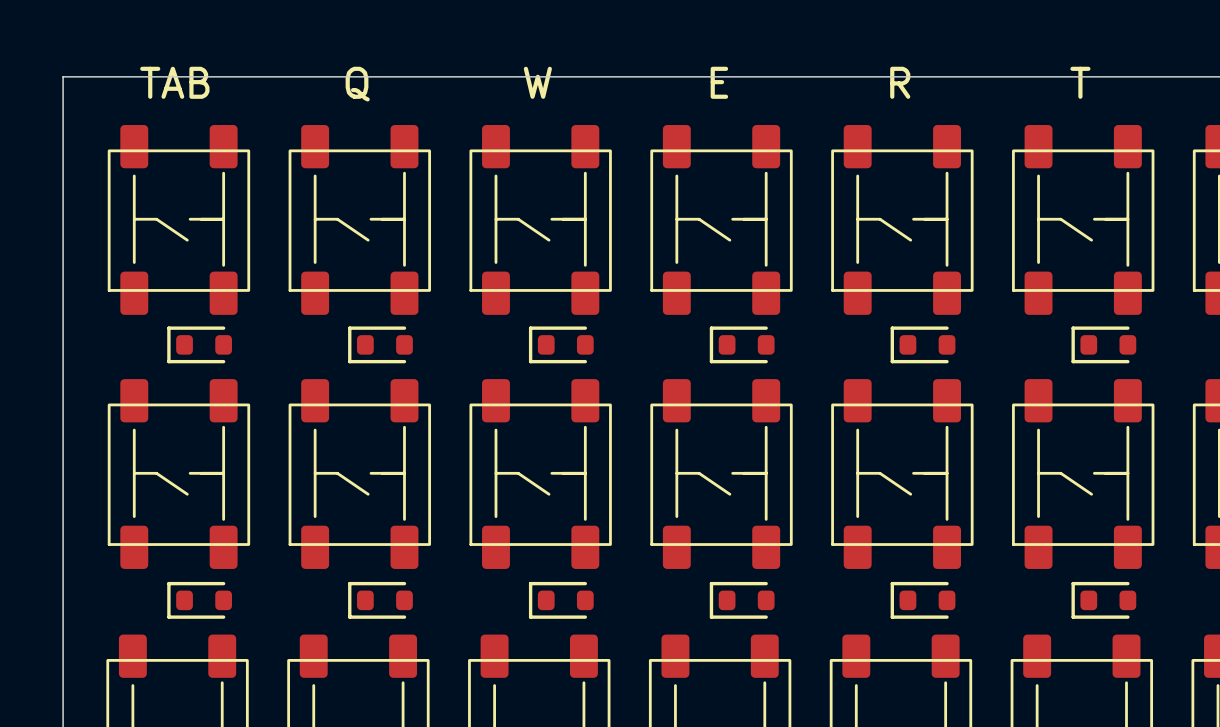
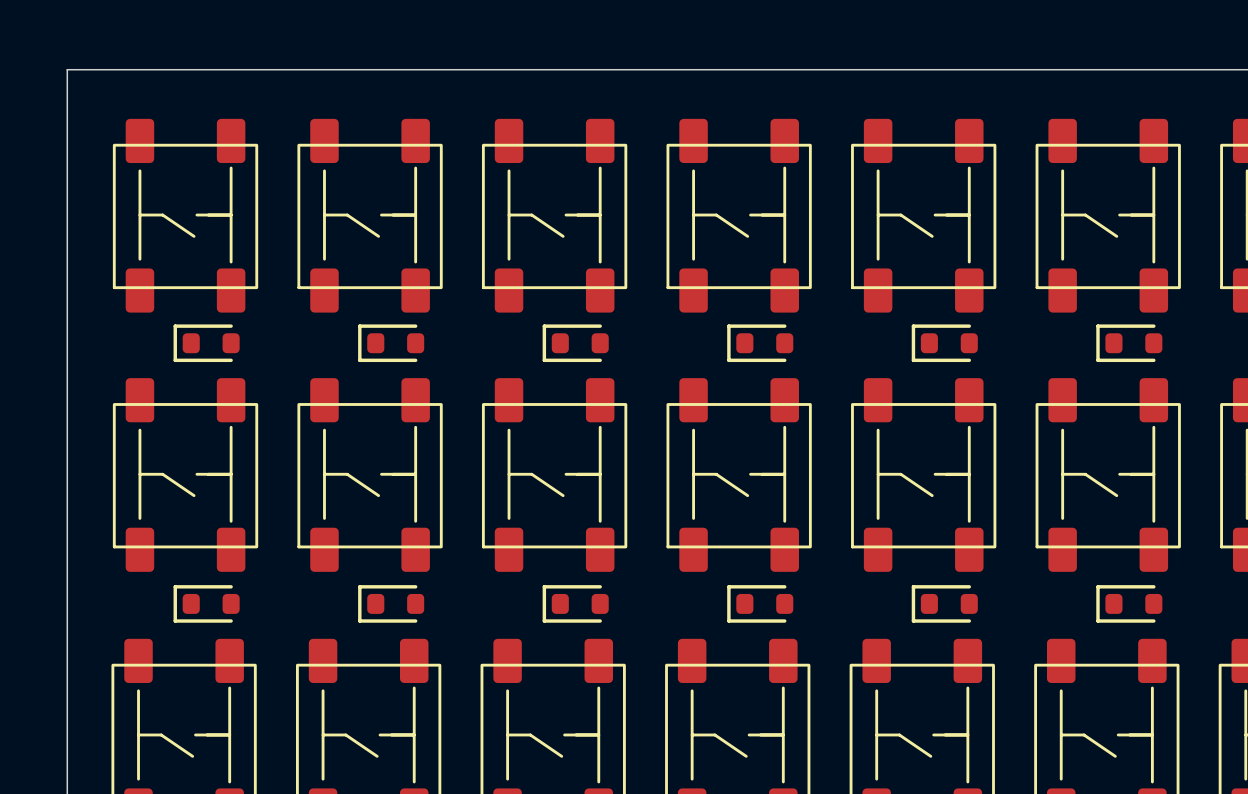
part value: TAB (174, 82) -> none
part value: W (537, 82) -> none
part value: E (719, 82) -> none
part value: R (900, 82) -> none
part value: T (1080, 82) -> none
part value: Q (357, 84) -> none

